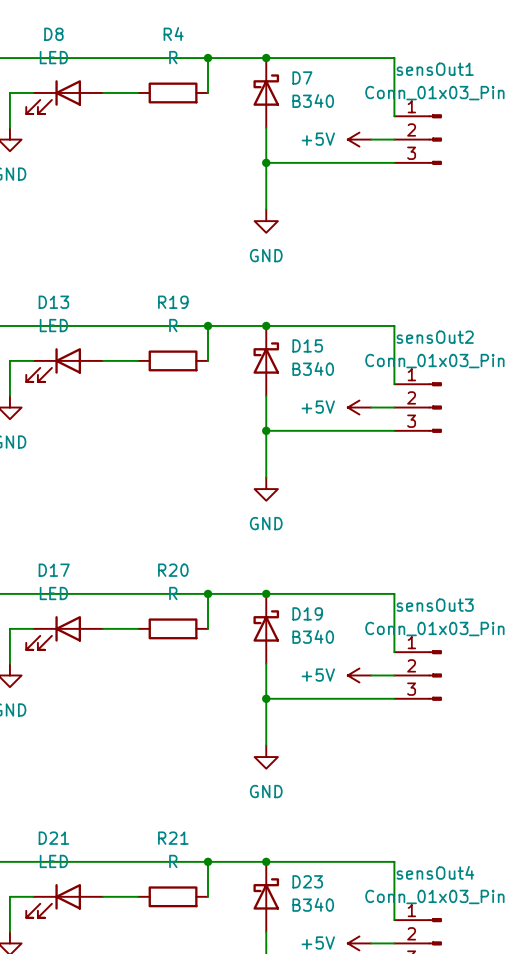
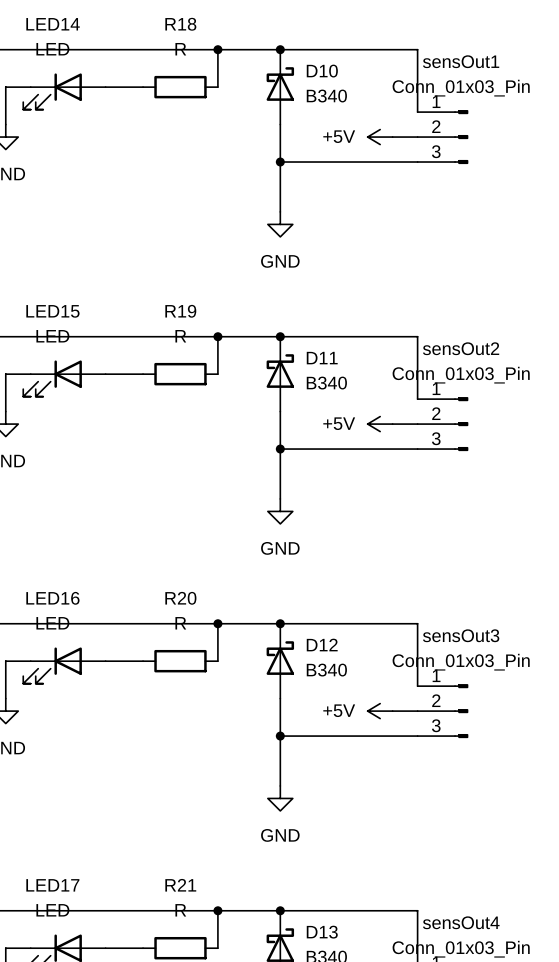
D8 name: D8 (53, 34) -> LED14 (53, 24)
R4 name: R4 (173, 34) -> R18 (180, 24)
D7 name: D7 (302, 77) -> D10 (322, 71)
D13 name: D13 (53, 302) -> LED15 (52, 311)
D15 name: D15 (307, 345) -> D11 (322, 358)
D17 name: D17 (54, 570) -> LED16 (52, 598)
D19 name: D19 (307, 613) -> D12 (322, 645)
D21 name: D21 (53, 838) -> LED17 (52, 885)
D23 name: D23 (307, 881) -> D13 (322, 932)

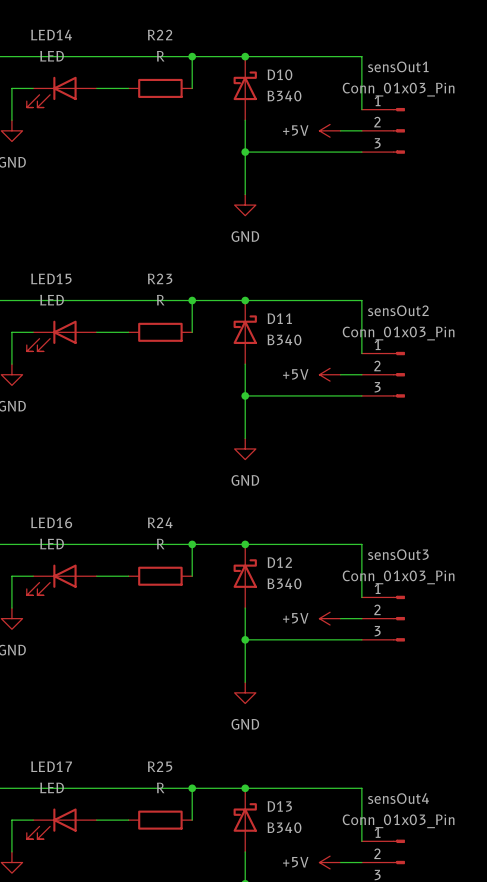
R18 name: R18 (180, 24) -> R22 (160, 35)
R19 name: R19 (180, 311) -> R23 (160, 278)
R20 name: R20 (180, 598) -> R24 (160, 522)
R21 name: R21 (180, 885) -> R25 (160, 766)

